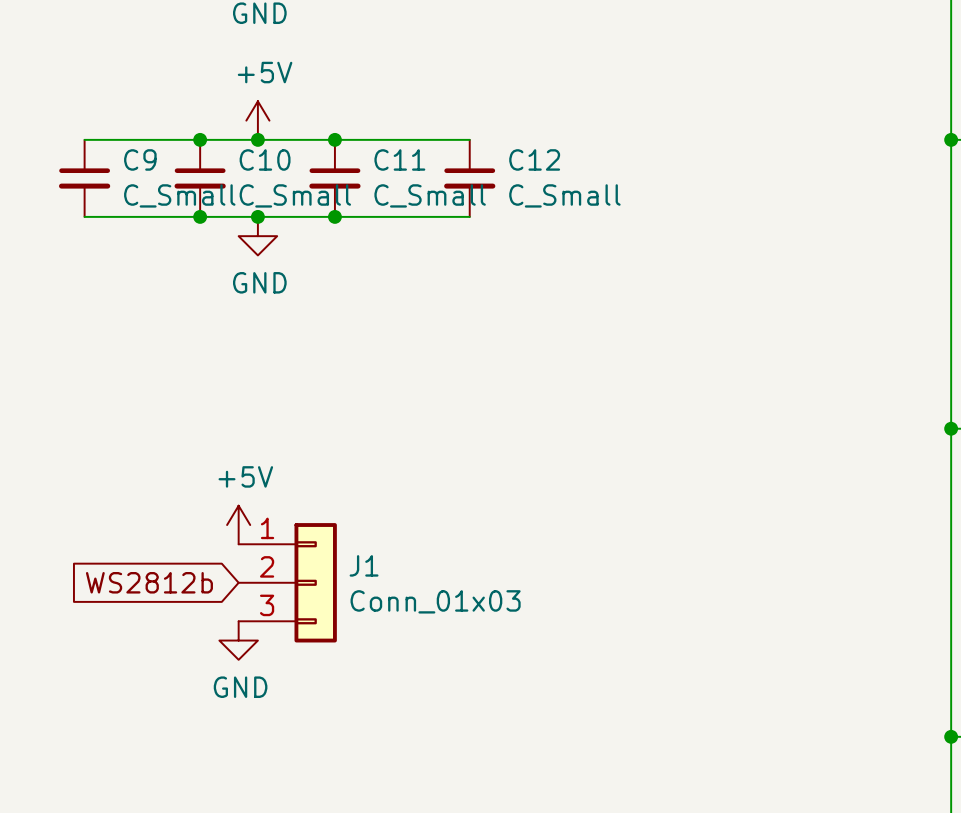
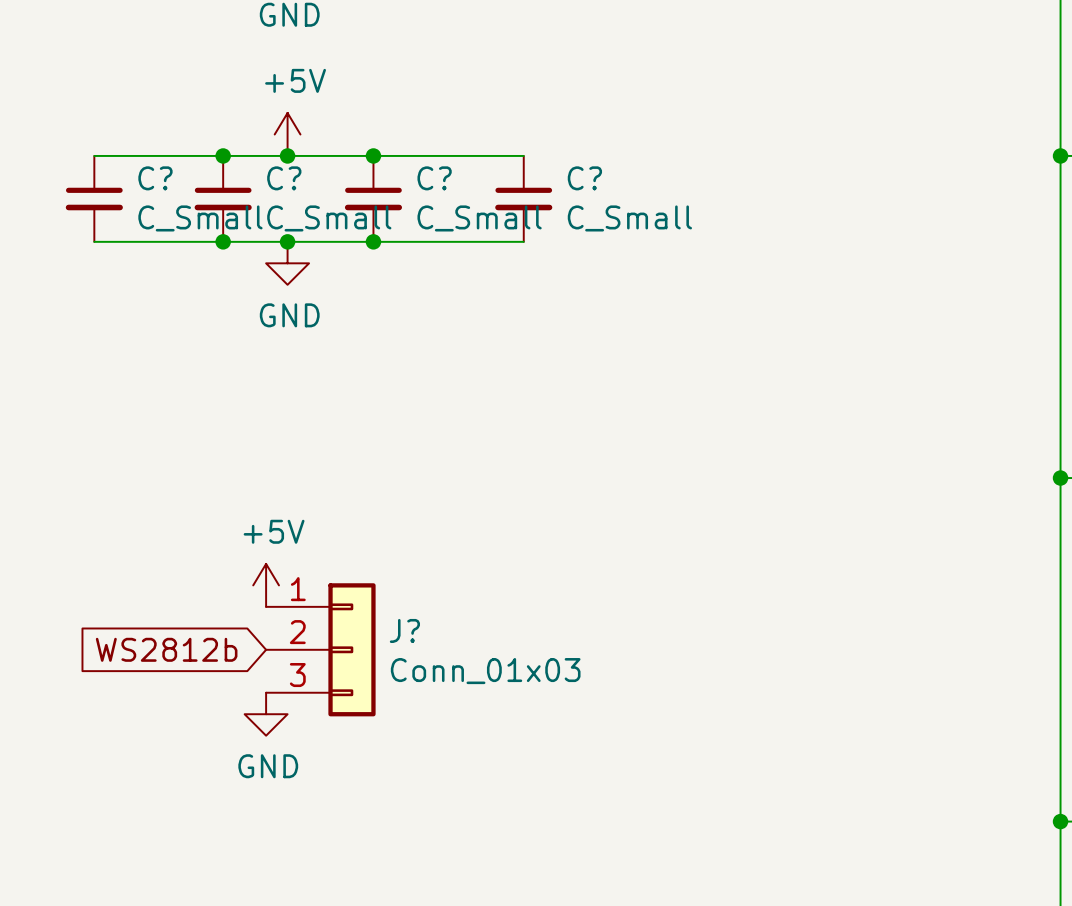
C9 name: C9 (140, 159) -> C? (155, 178)
C10 name: C10 (265, 159) -> C? (284, 178)
C11 name: C11 (399, 159) -> C? (434, 178)
C12 name: C12 (534, 159) -> C? (584, 178)
J1 name: J1 (364, 565) -> J? (404, 630)

